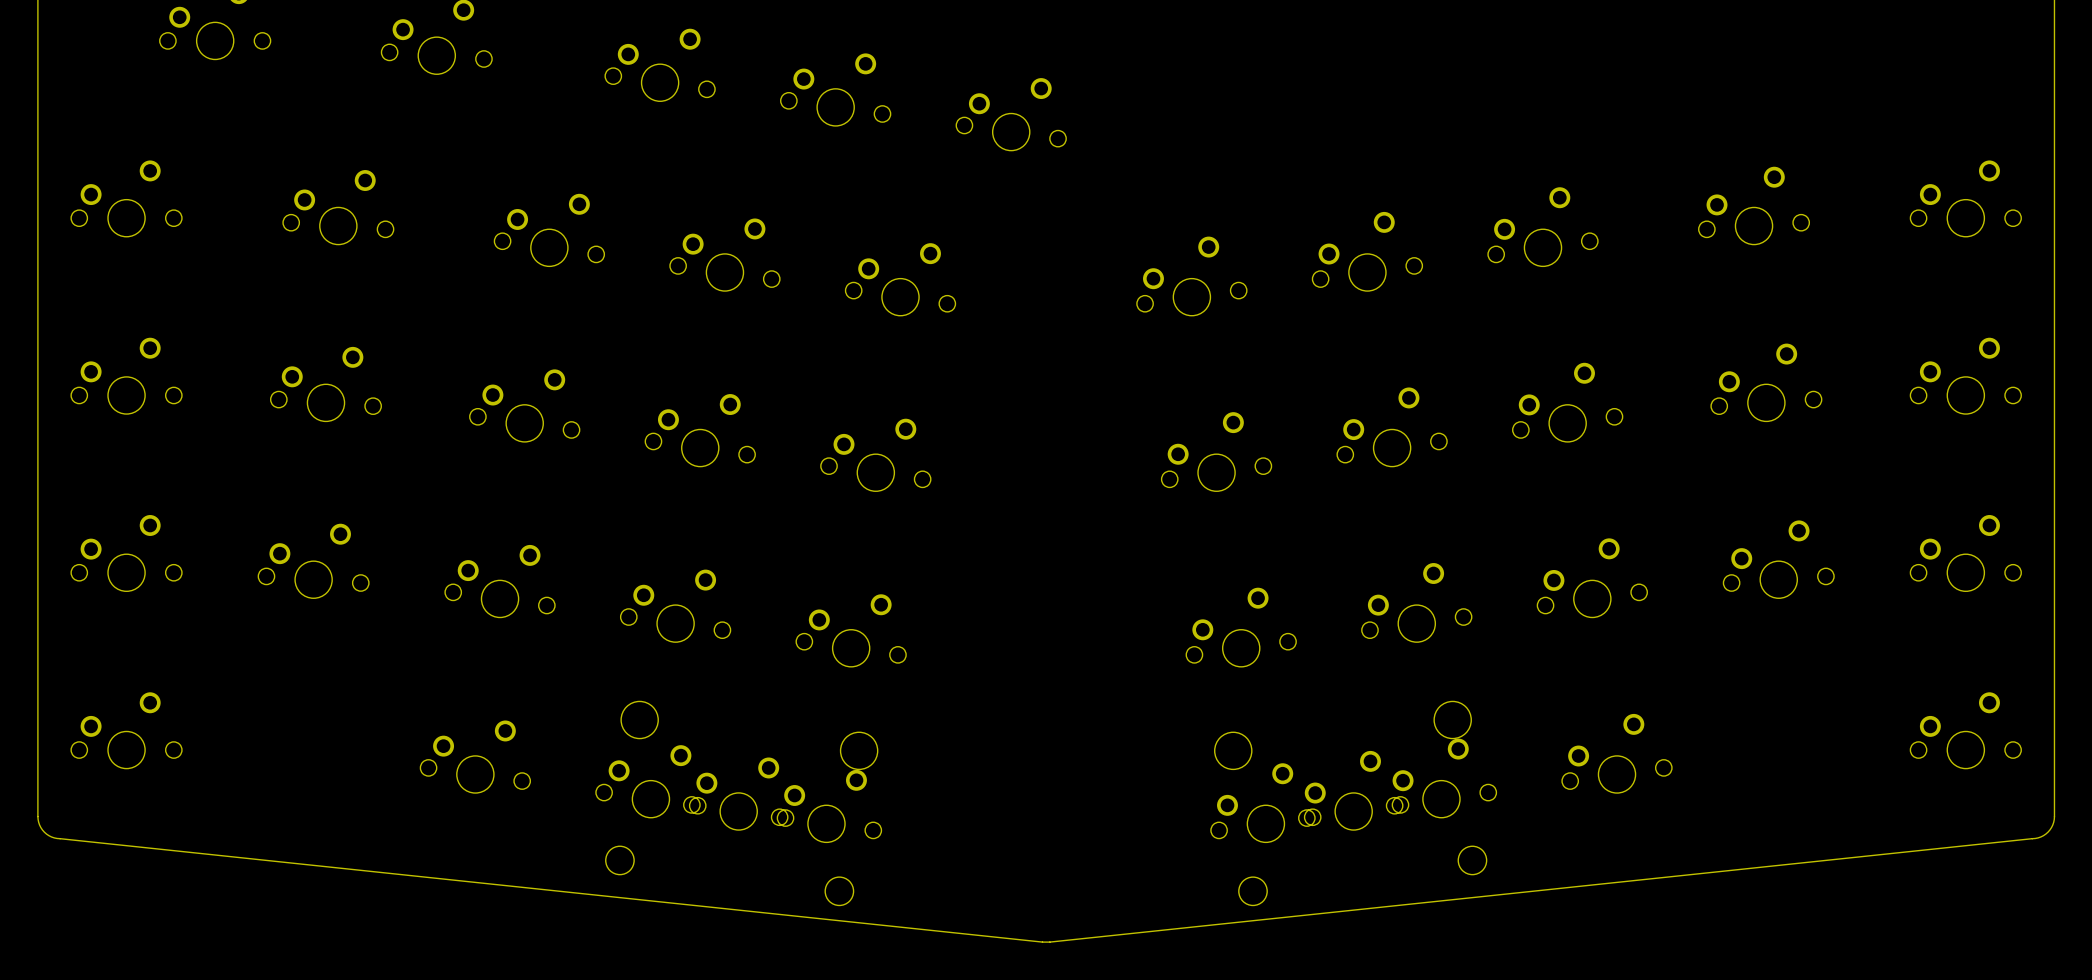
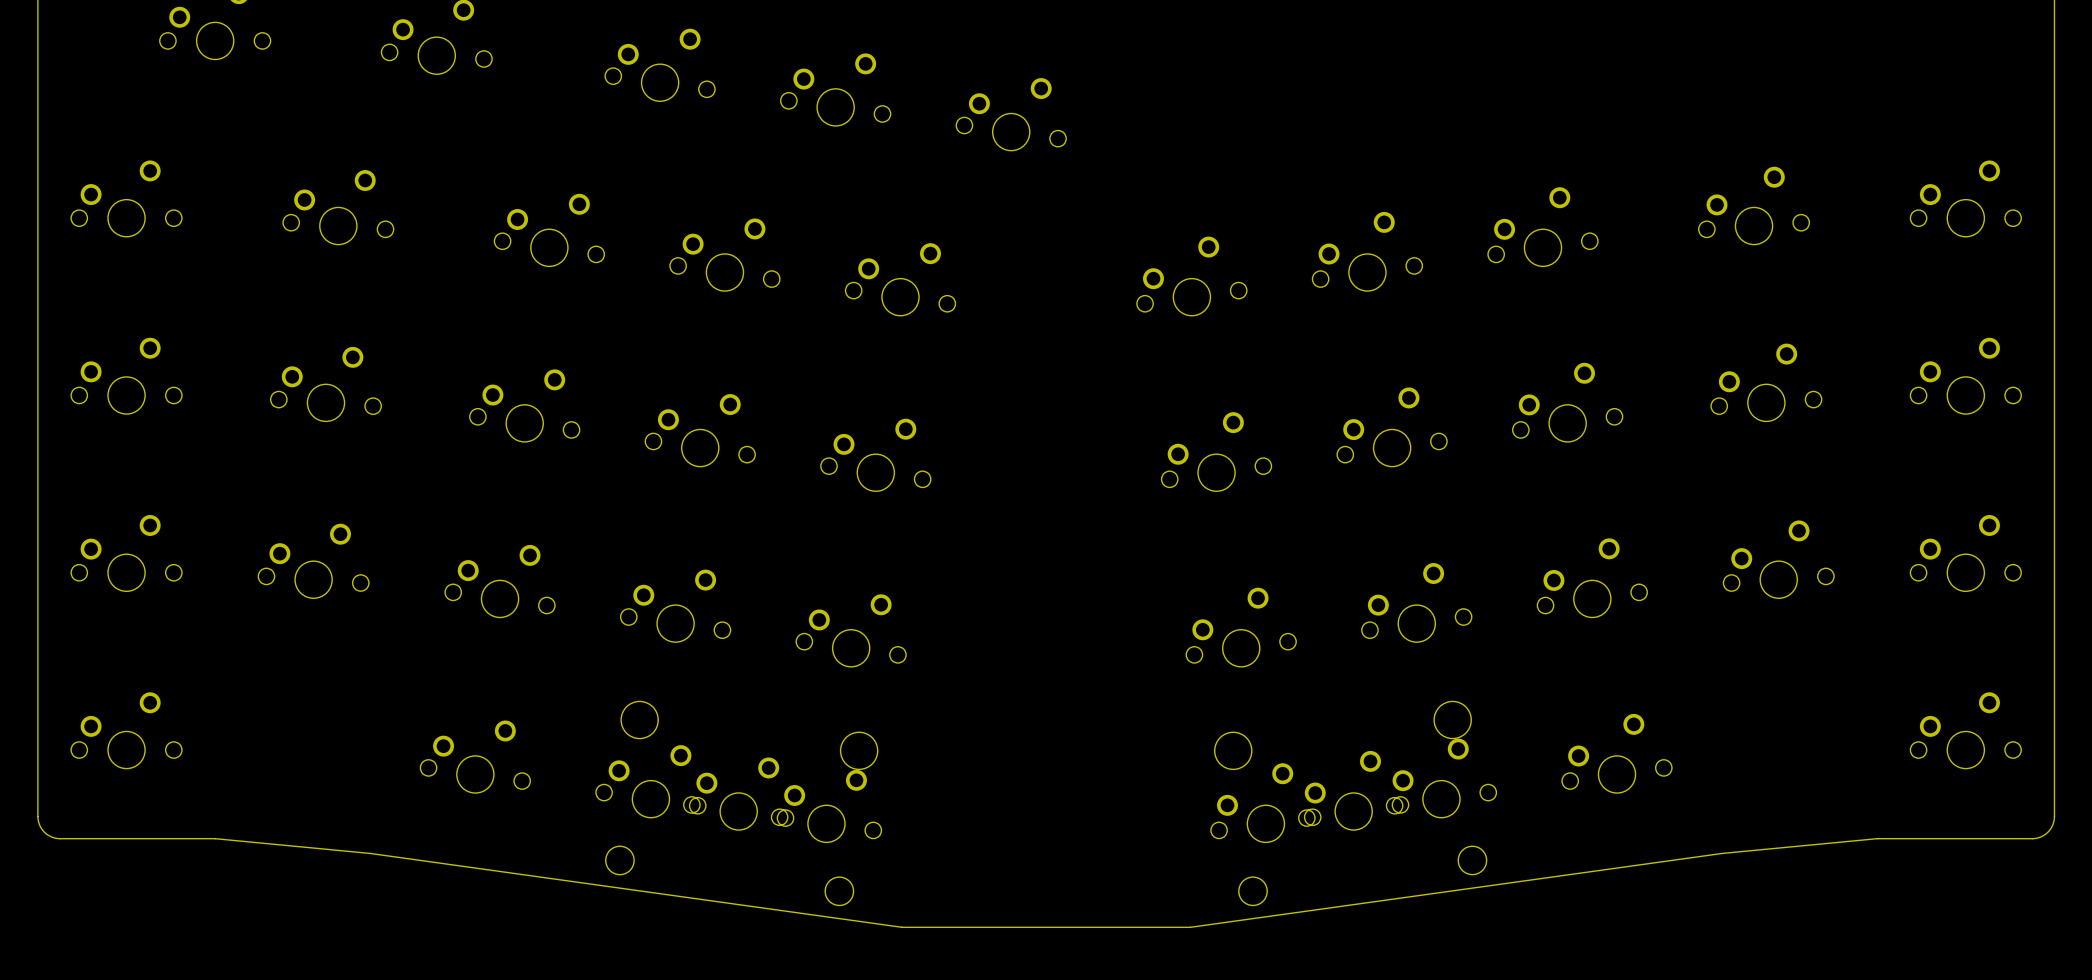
board edge: (2032, 838) (1049, 942) (60, 838) -> (2032, 838) (1877, 838) (1722, 853) (1190, 927) (902, 927) (370, 853) (215, 838) (60, 838)

